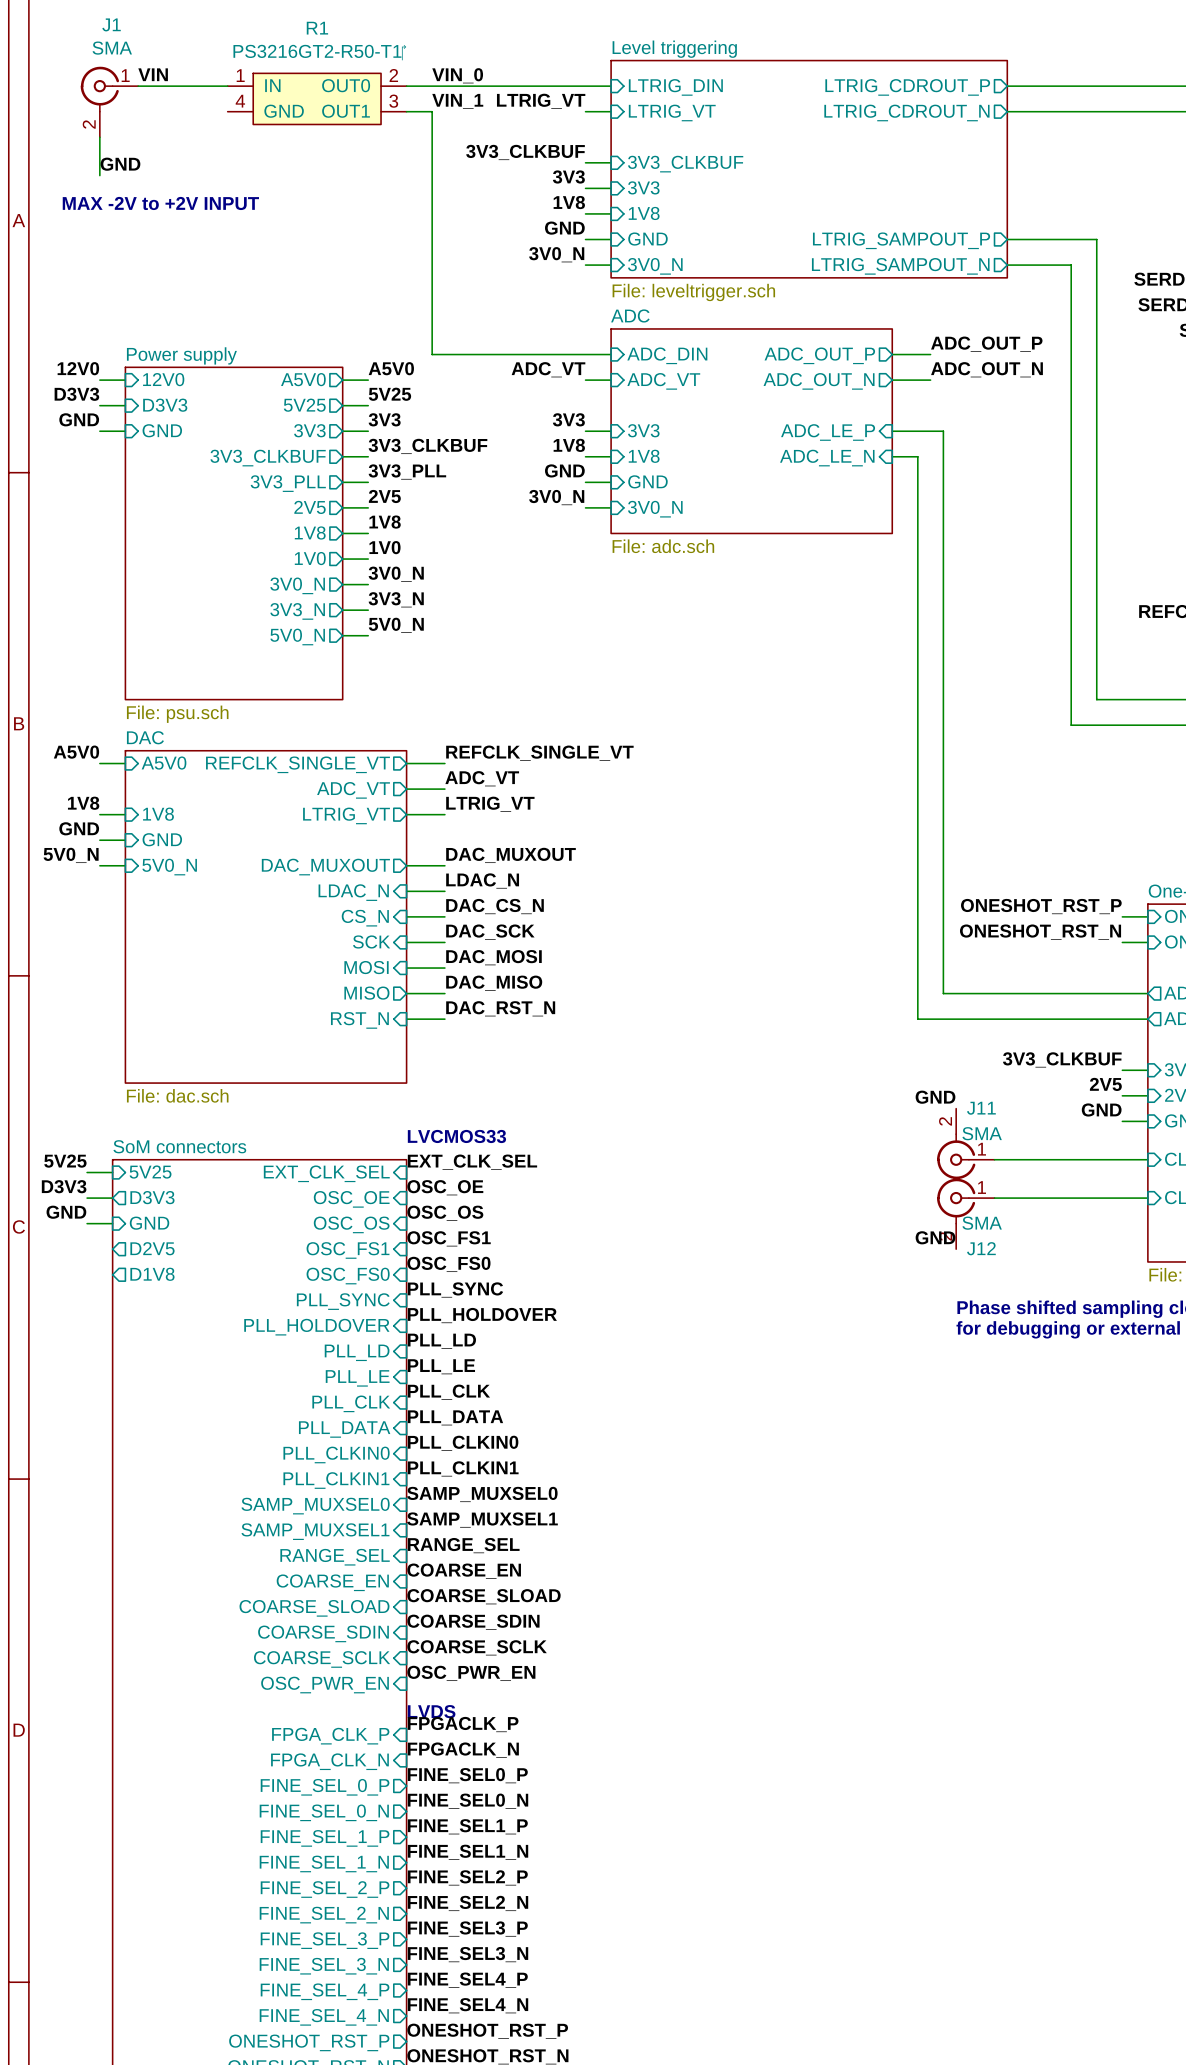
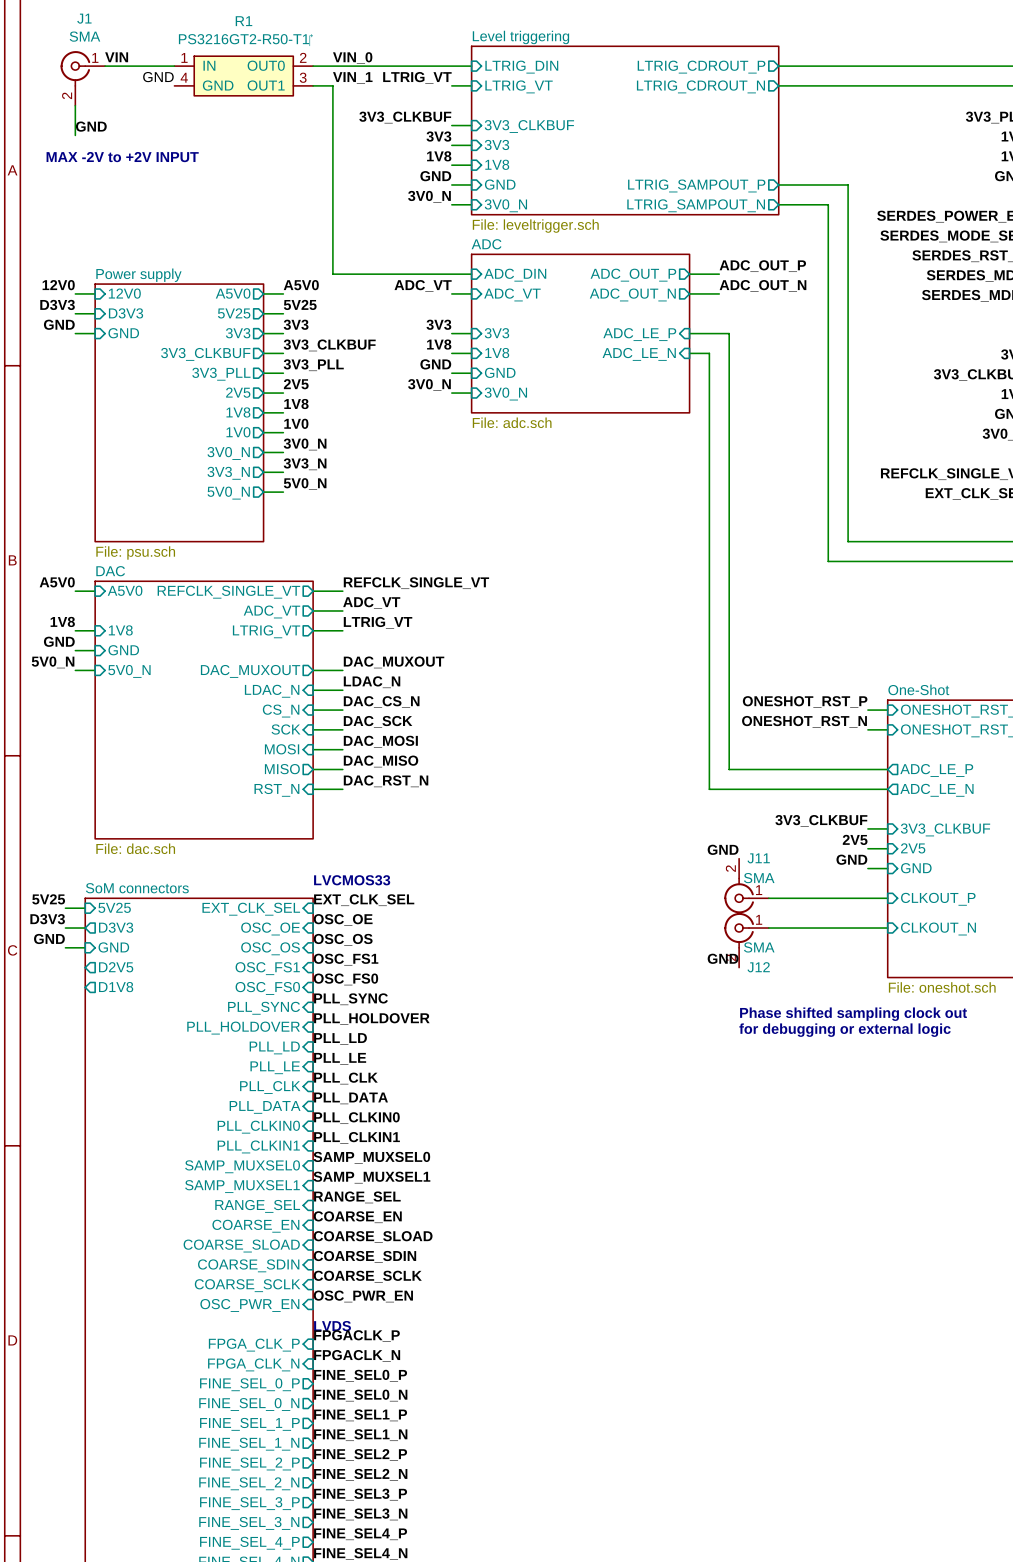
label: none -> GND (158, 77)

